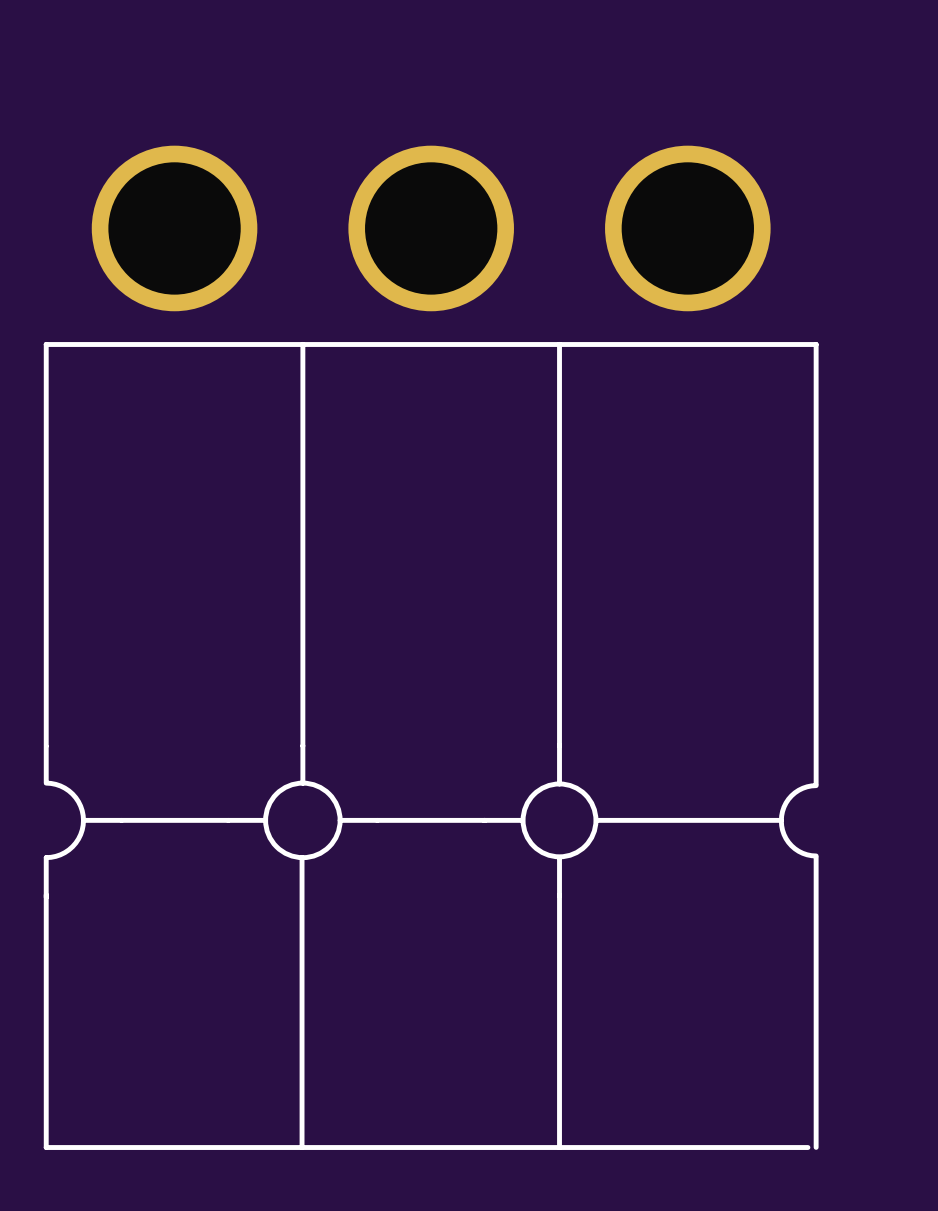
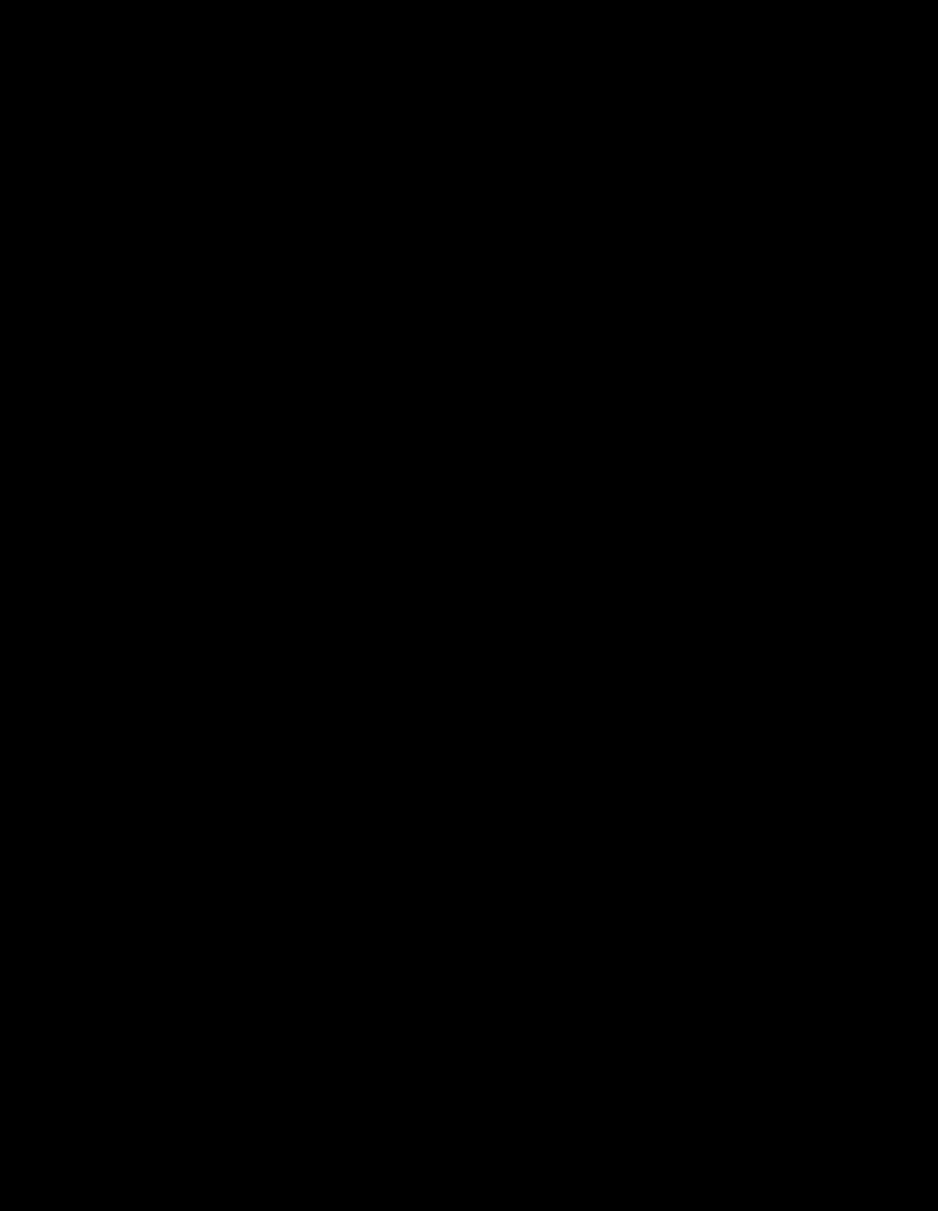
part: (431, 647) -> none

